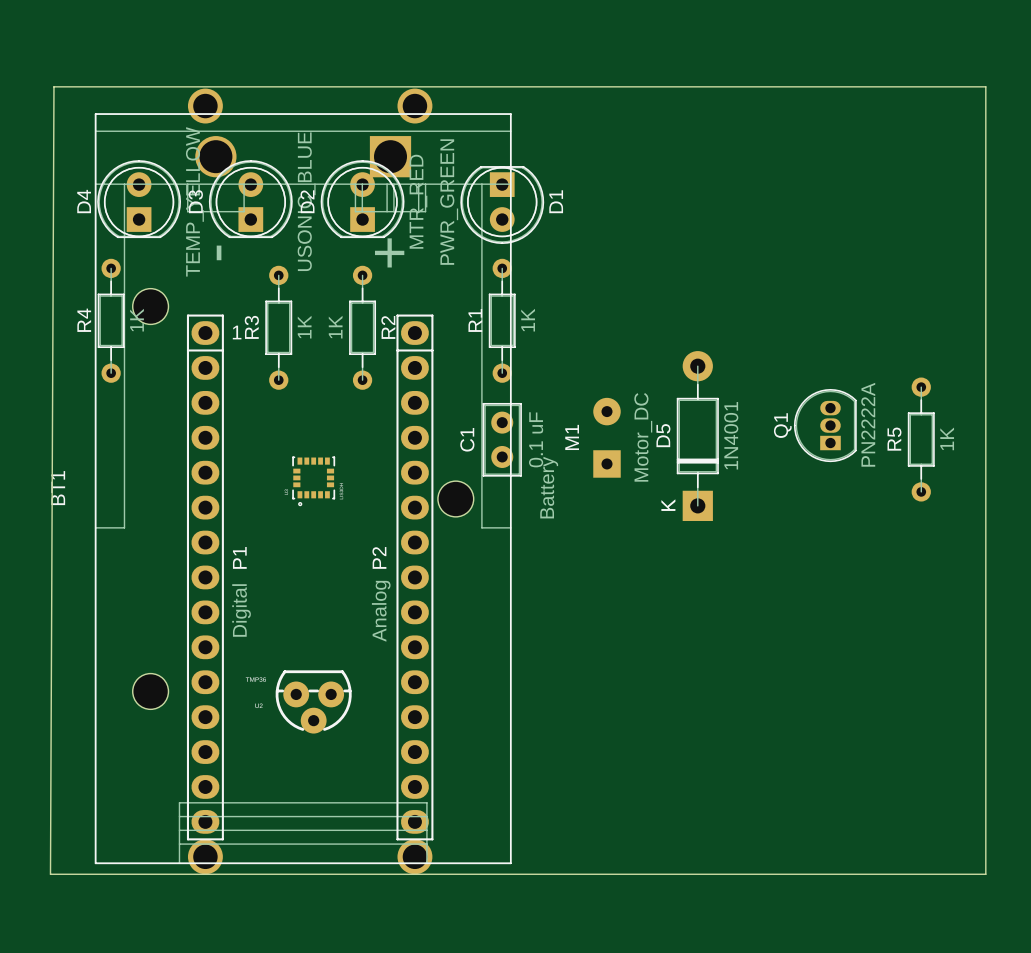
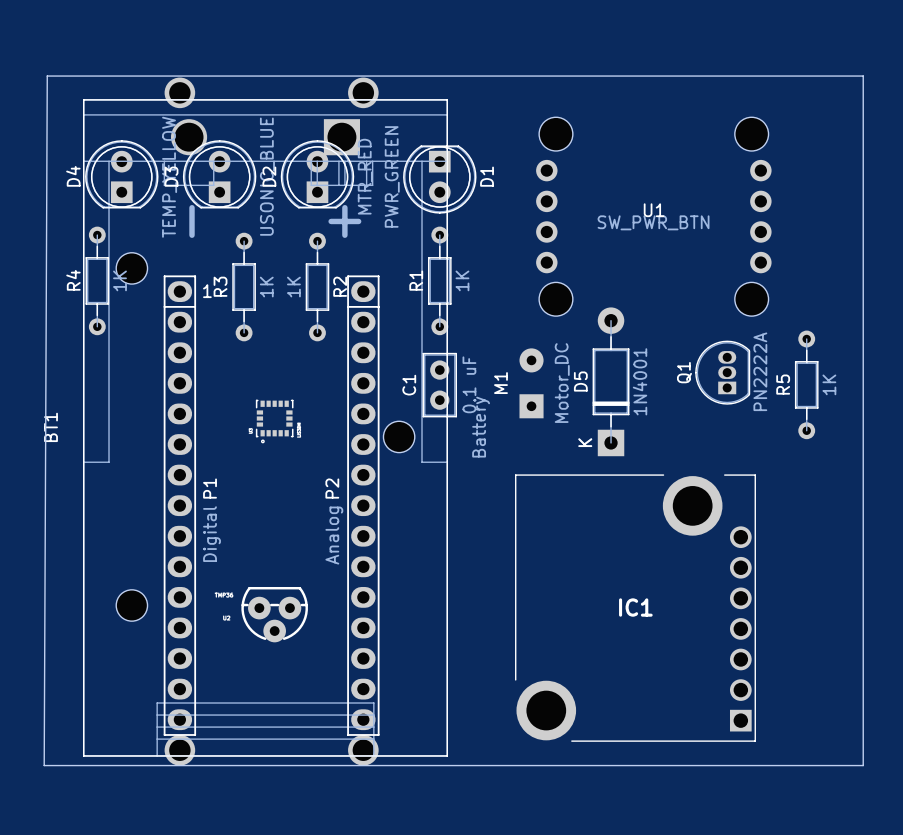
U1: none -> SW_PWR_BTN (653, 216)
IC1: none -> (635, 608)

